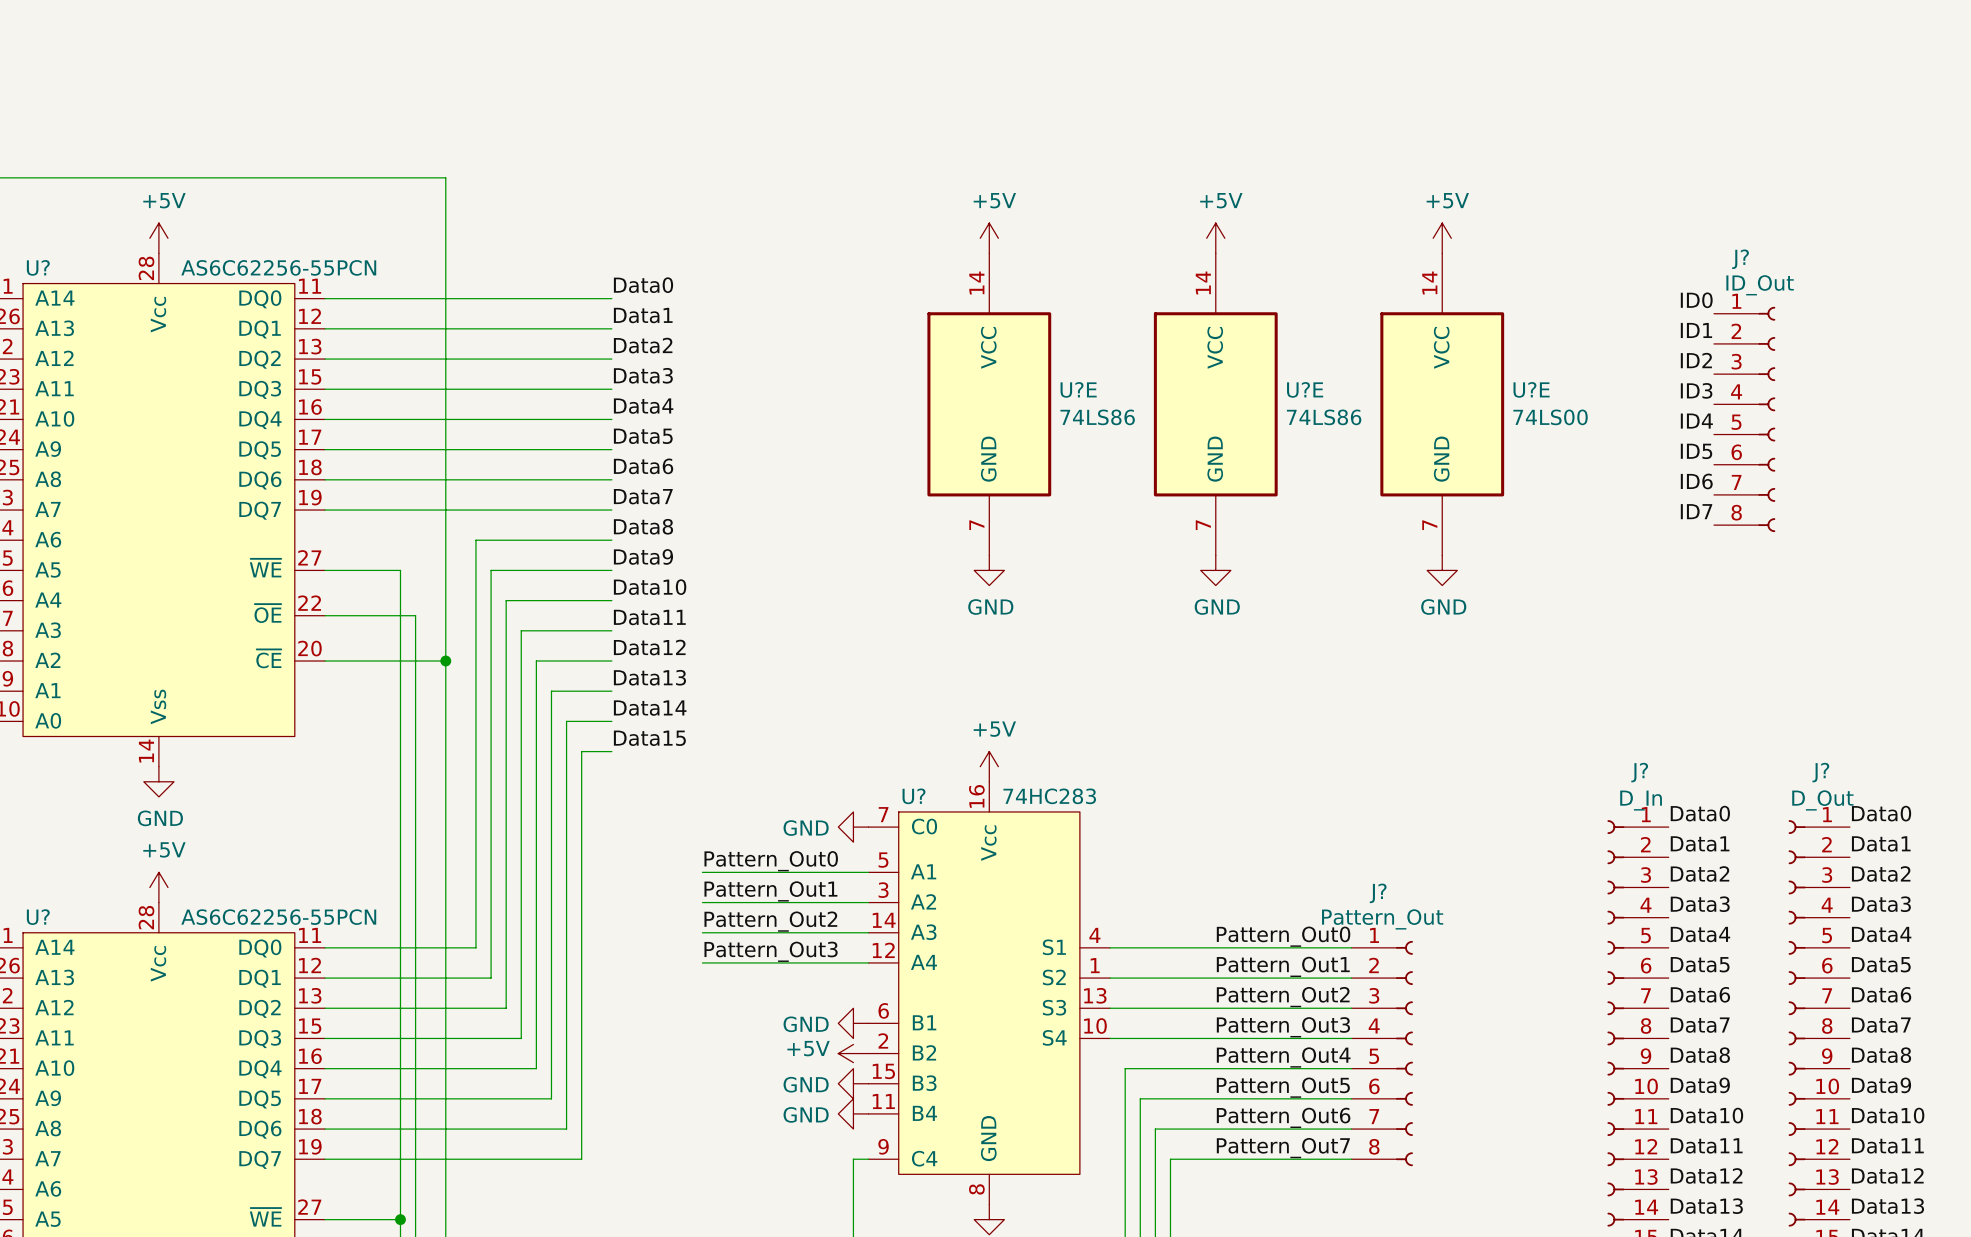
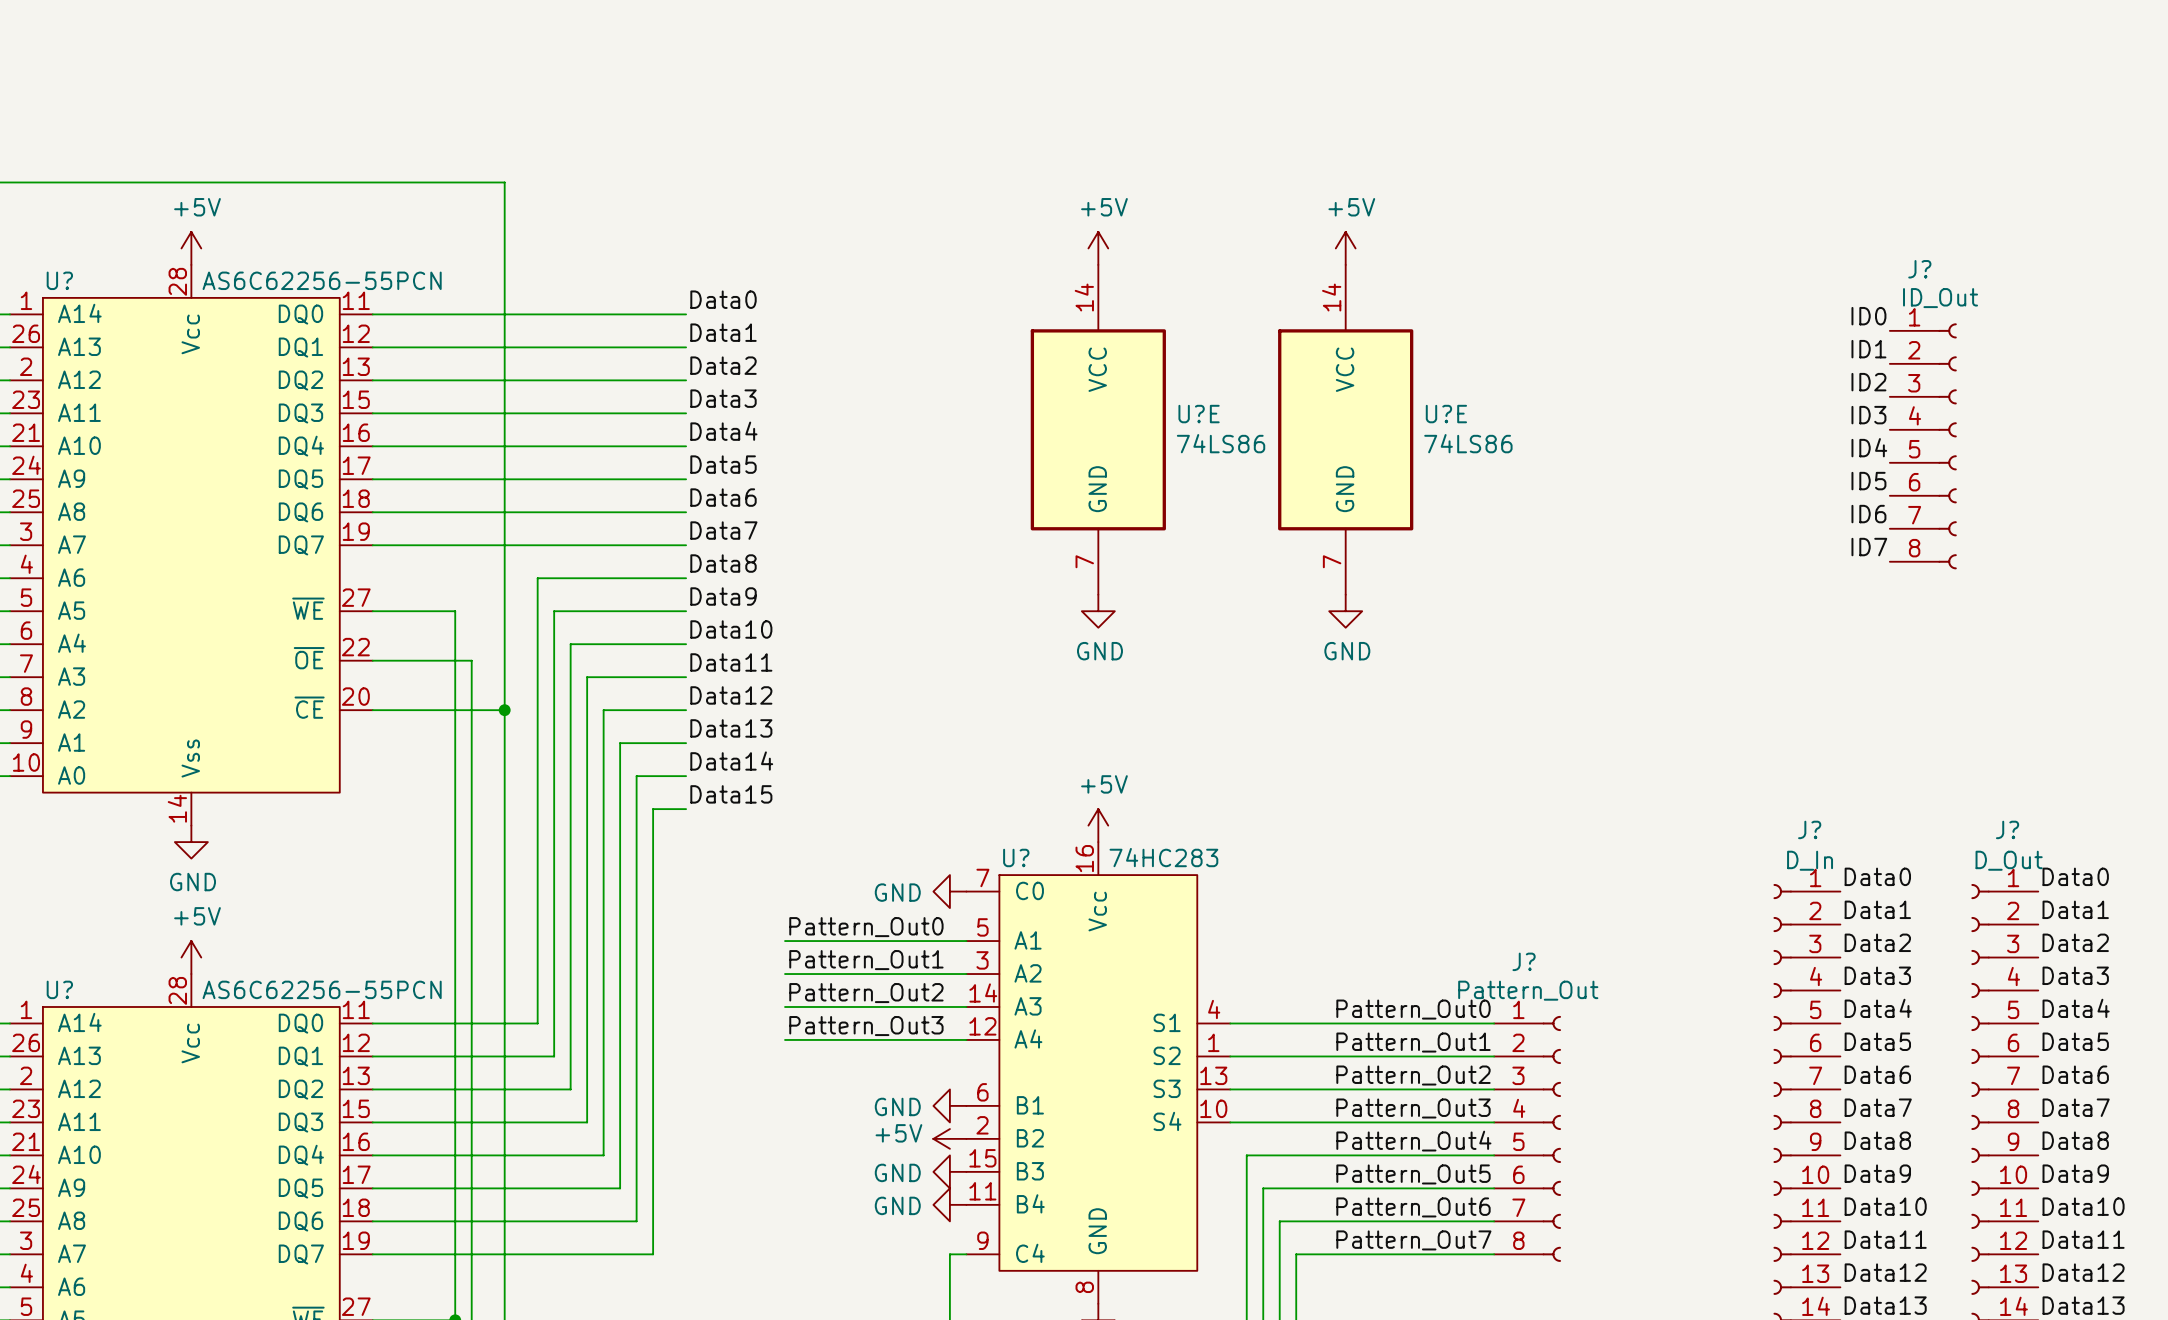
power symbol: +5V (1442, 238) -> none
U?E: 74LS00 (1442, 404) -> none
power symbol: GND (1442, 570) -> none

